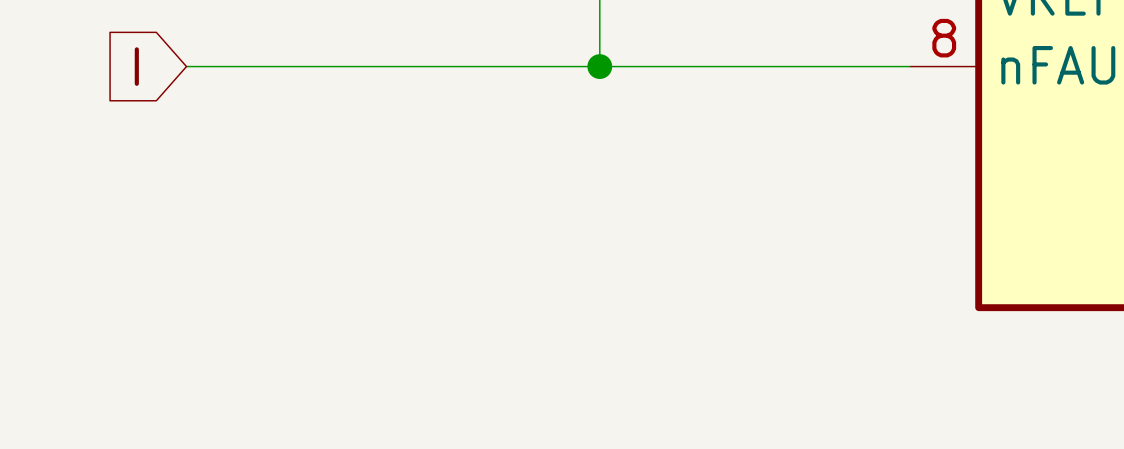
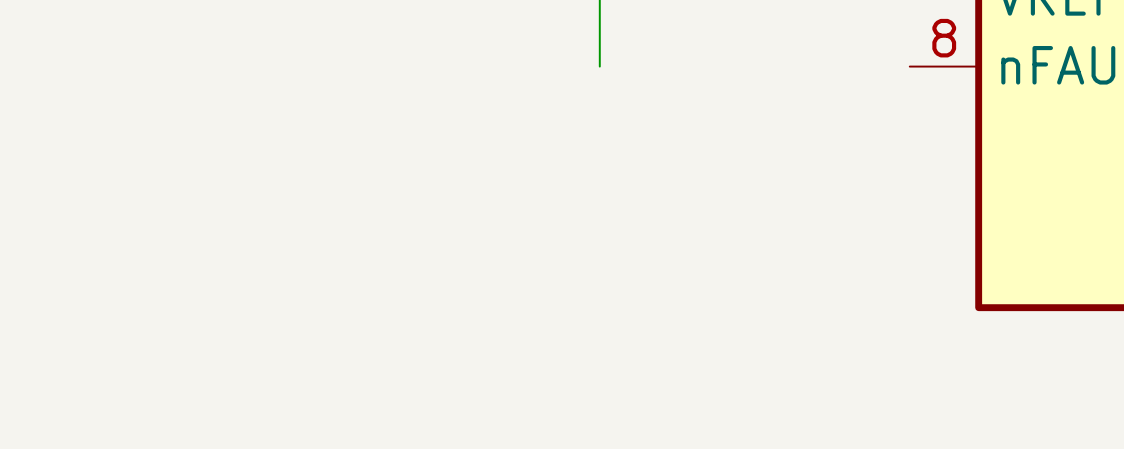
global label: I (136, 66) -> none
wire: (186, 66) (909, 66) -> none
junction: (599, 66) -> none

